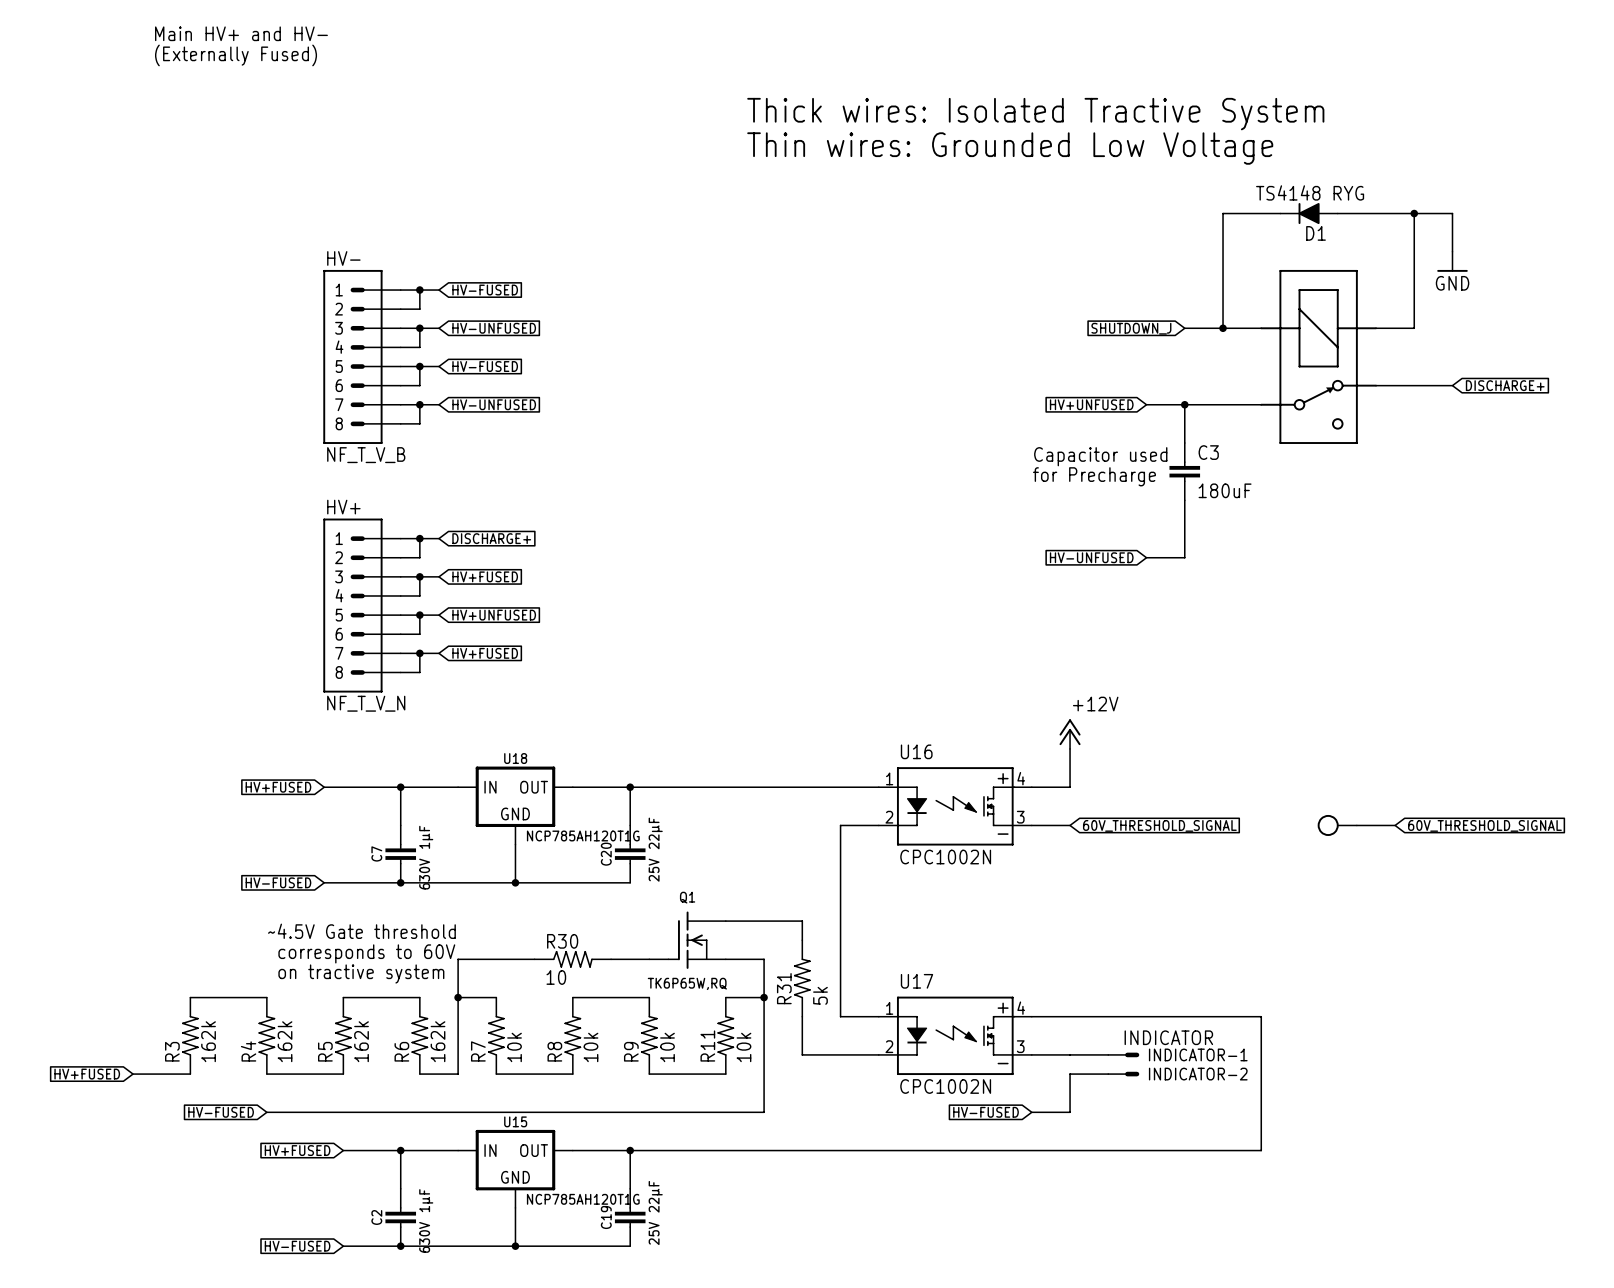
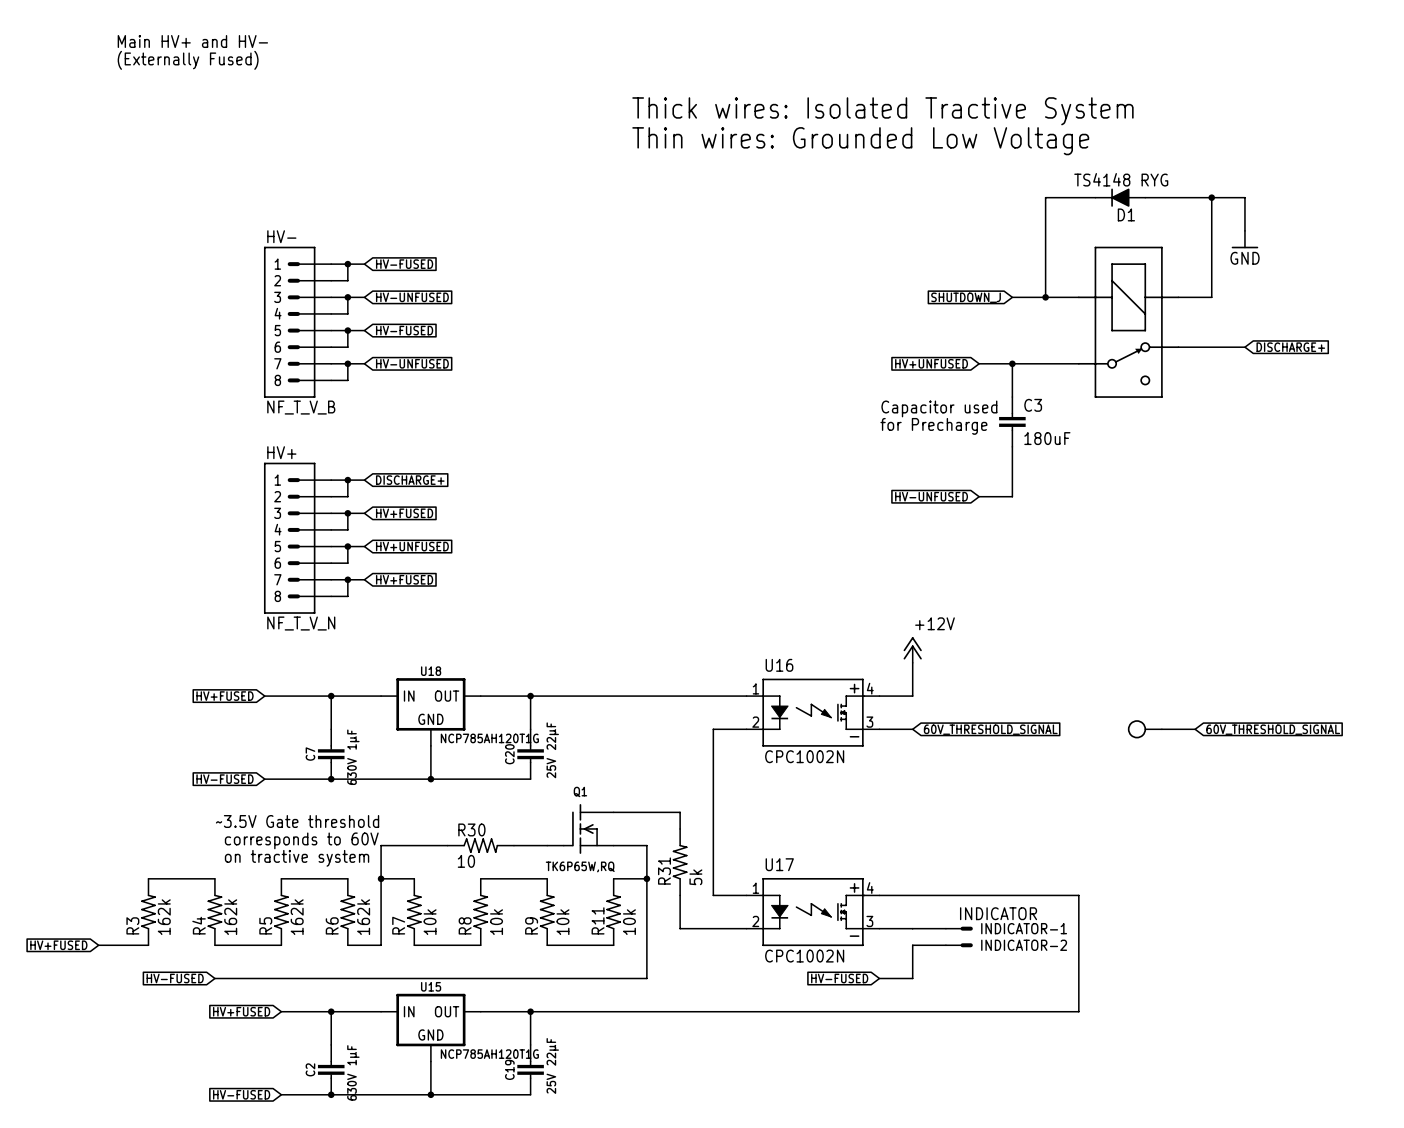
text: ~4.5V Gate threshold (361, 931) -> ~3.5V Gate threshold (297, 821)

